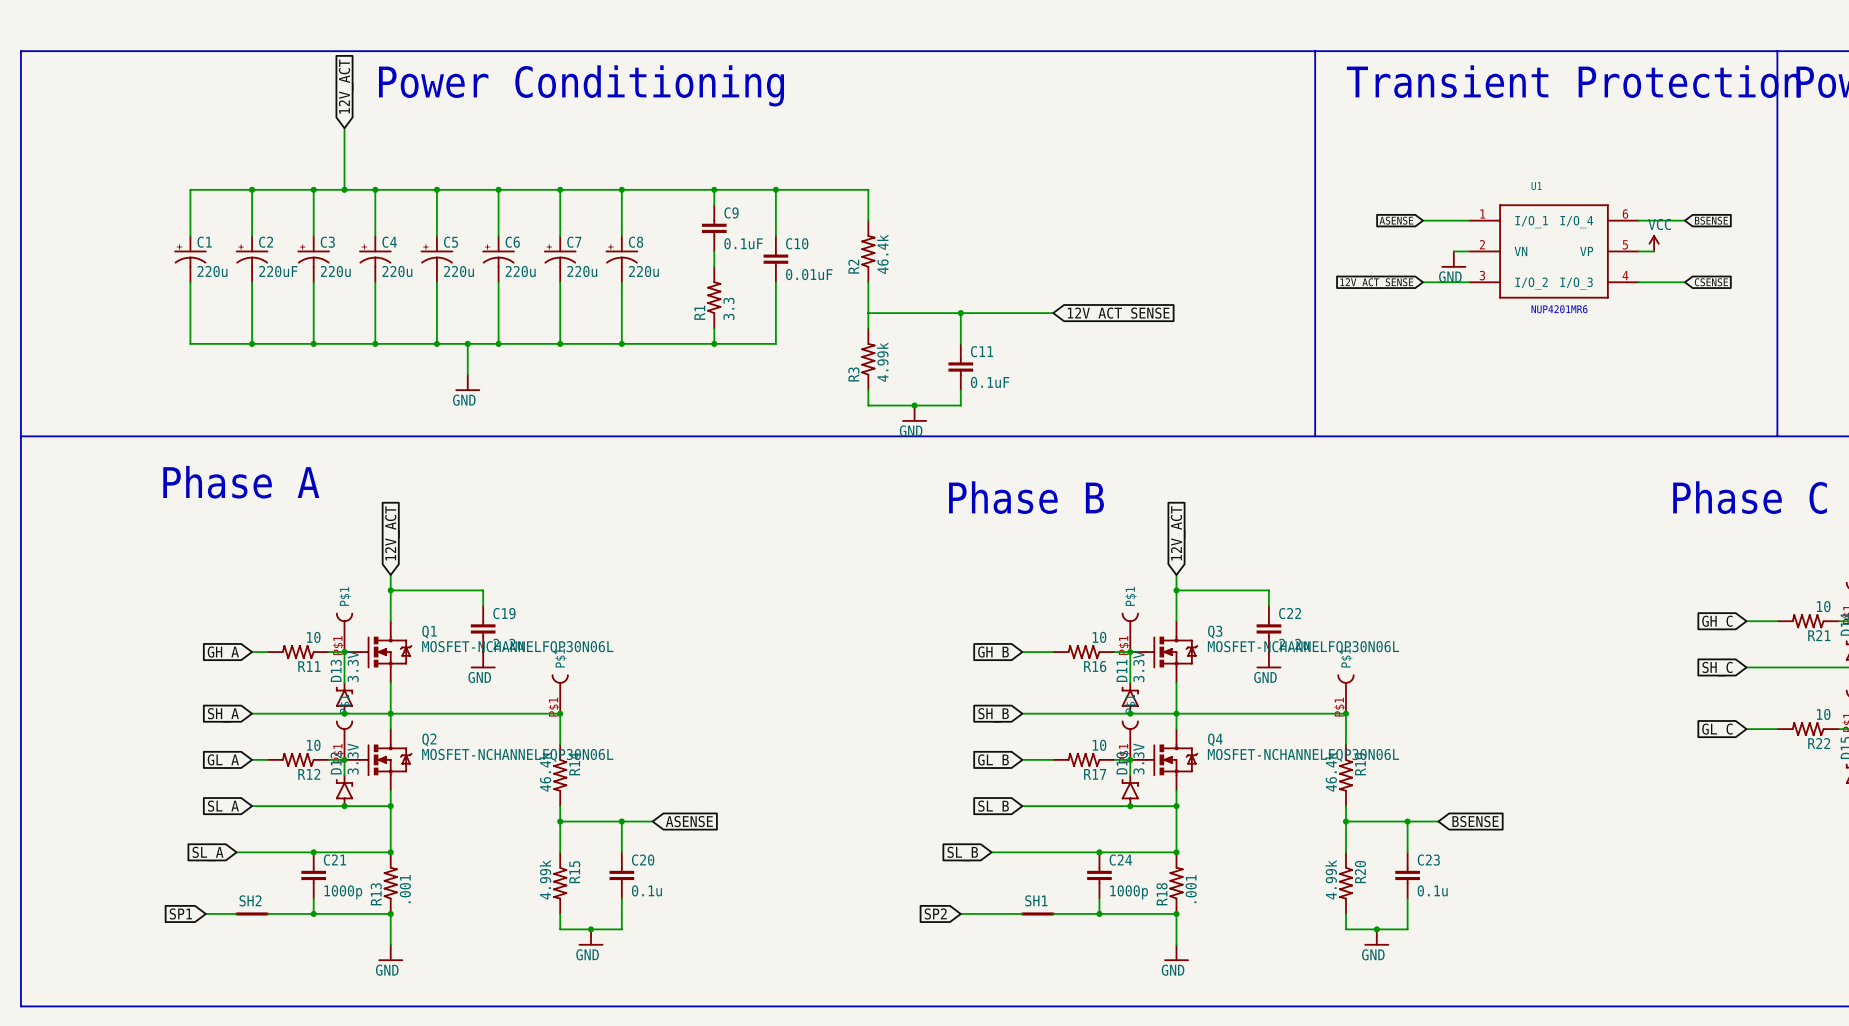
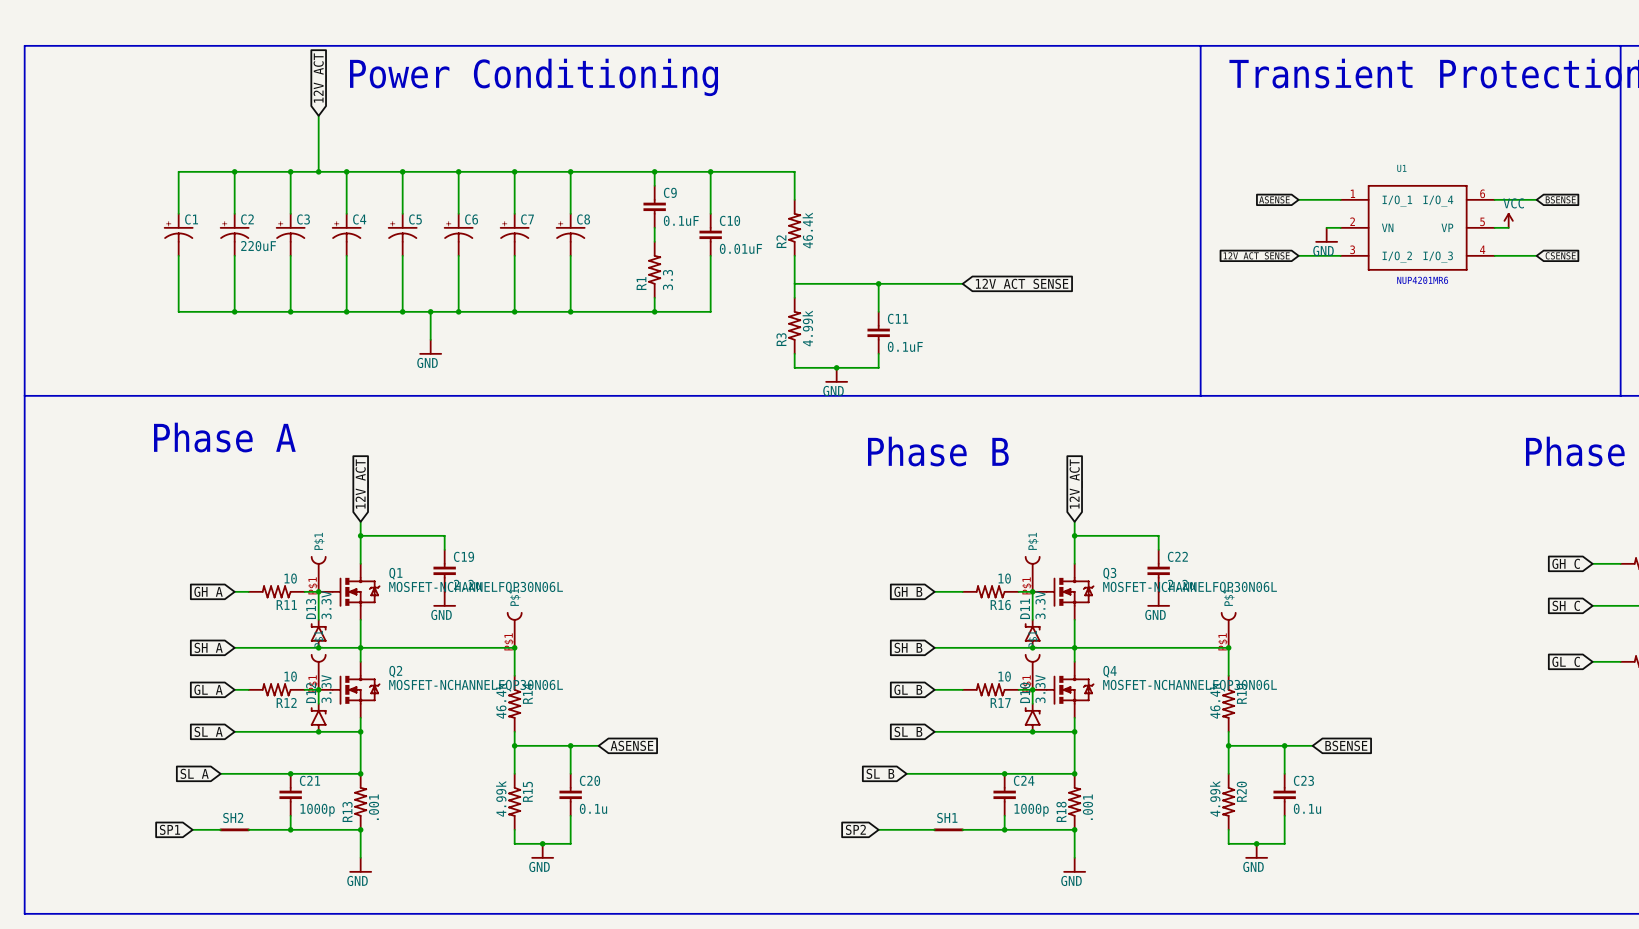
C1 value: 220u (212, 271) -> none
C3 value: 220u (335, 271) -> none
C4 value: 220u (397, 271) -> none
C5 value: 220u (459, 271) -> none
C6 value: 220u (520, 271) -> none
C7 value: 220u (582, 271) -> none
C8 value: 220u (643, 271) -> none

